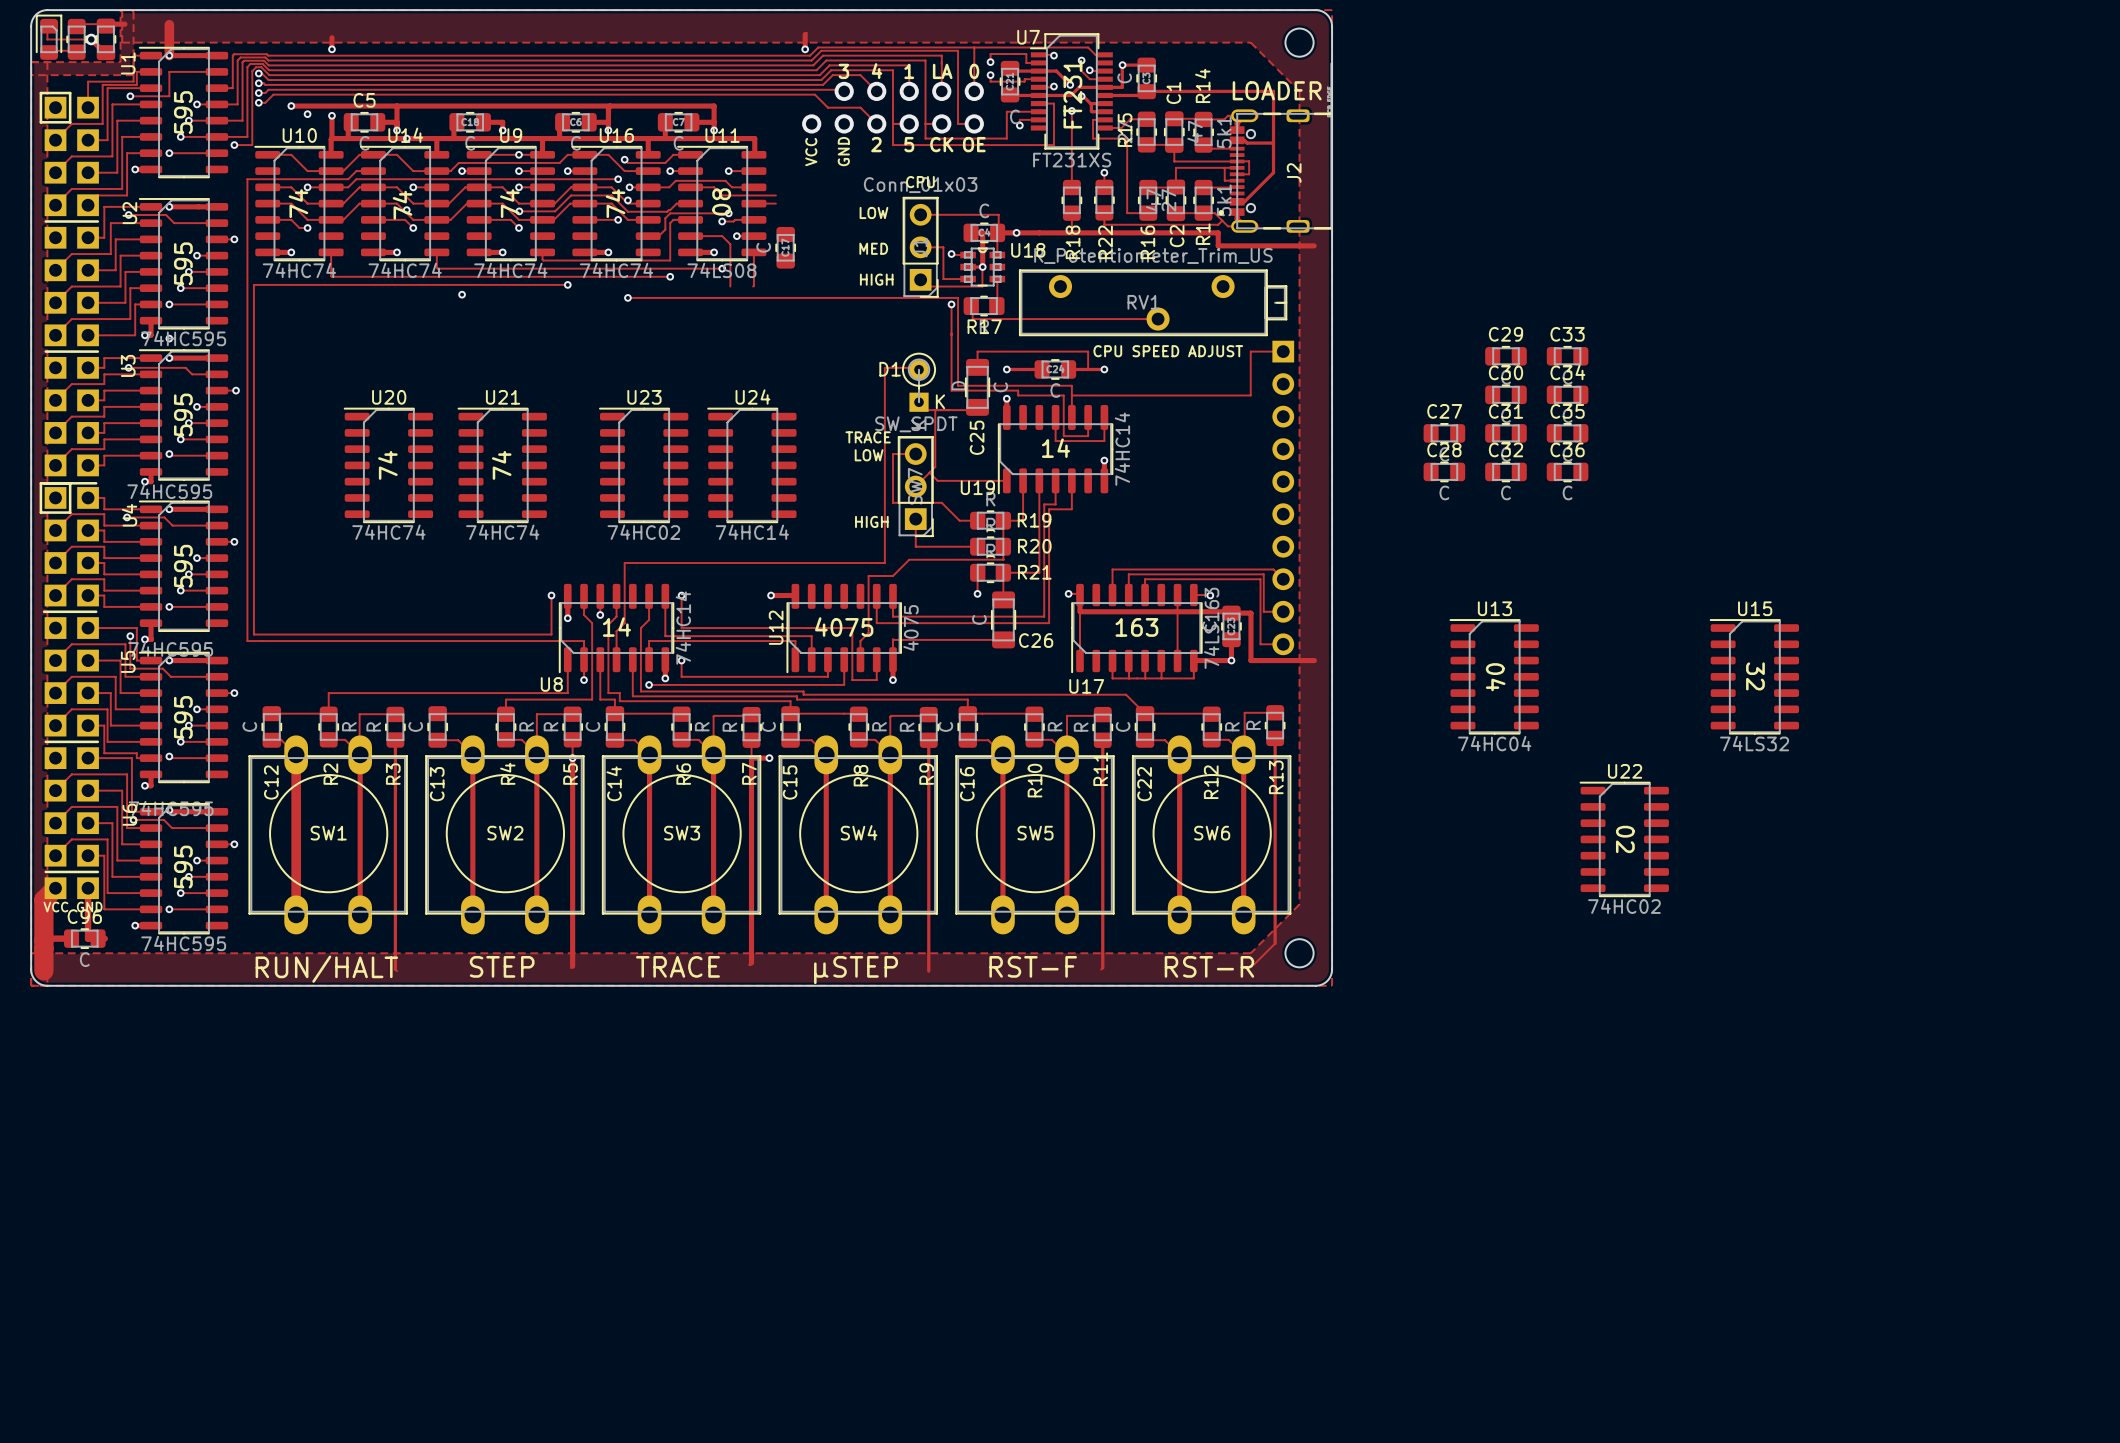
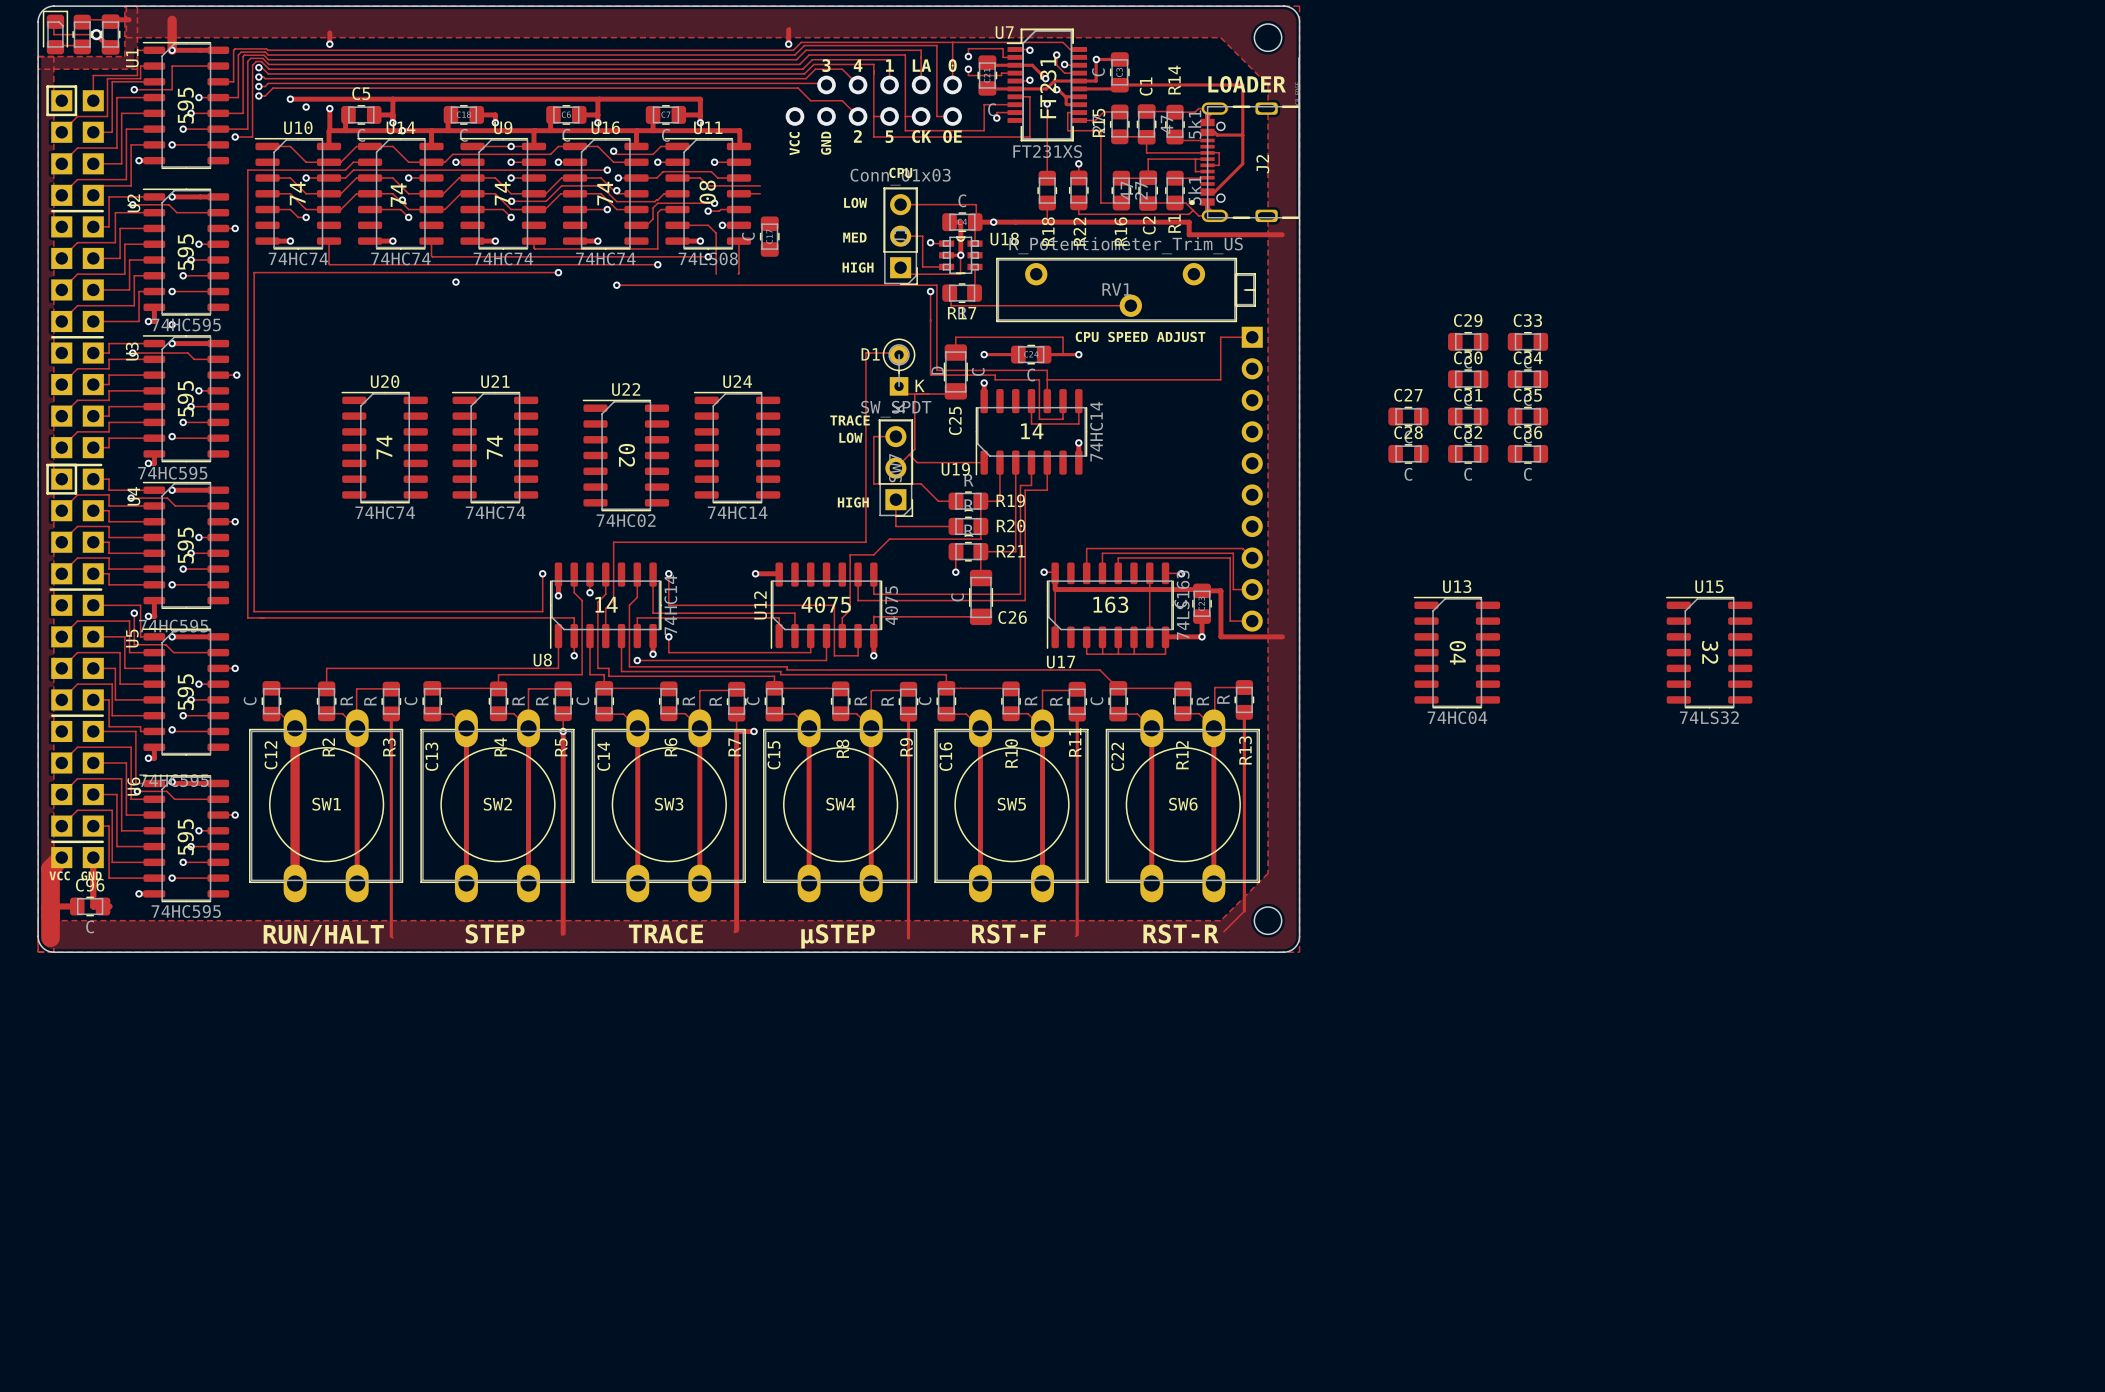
U23: 74HC02 (643, 465) -> none
text: none -> 02 (626, 455)
U22 position: (1624, 839) -> (625, 455)
text: 02 (1625, 839) -> none

